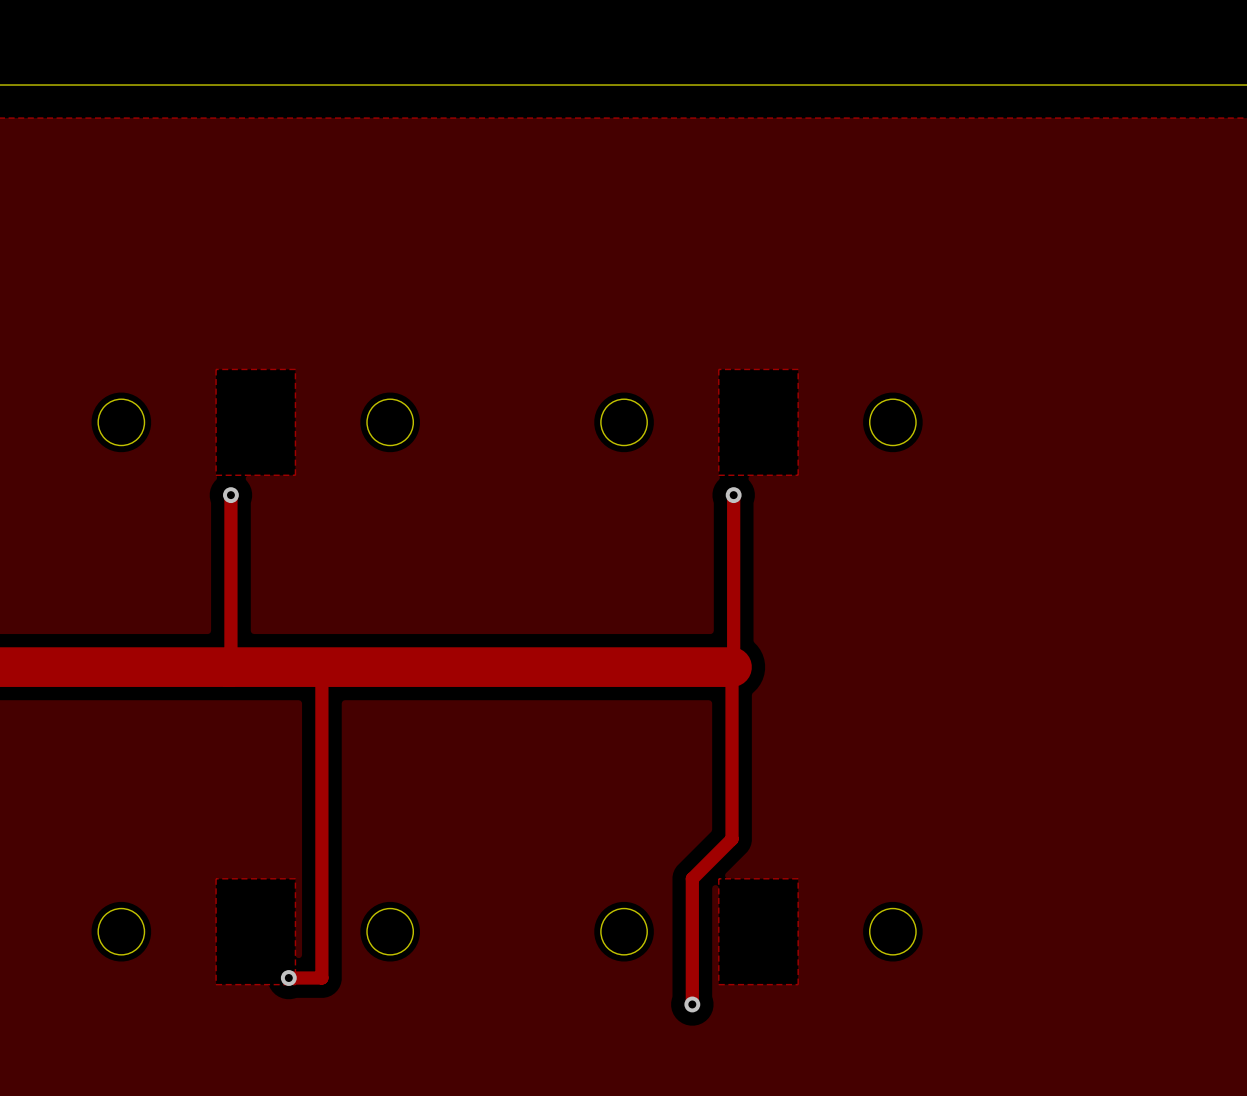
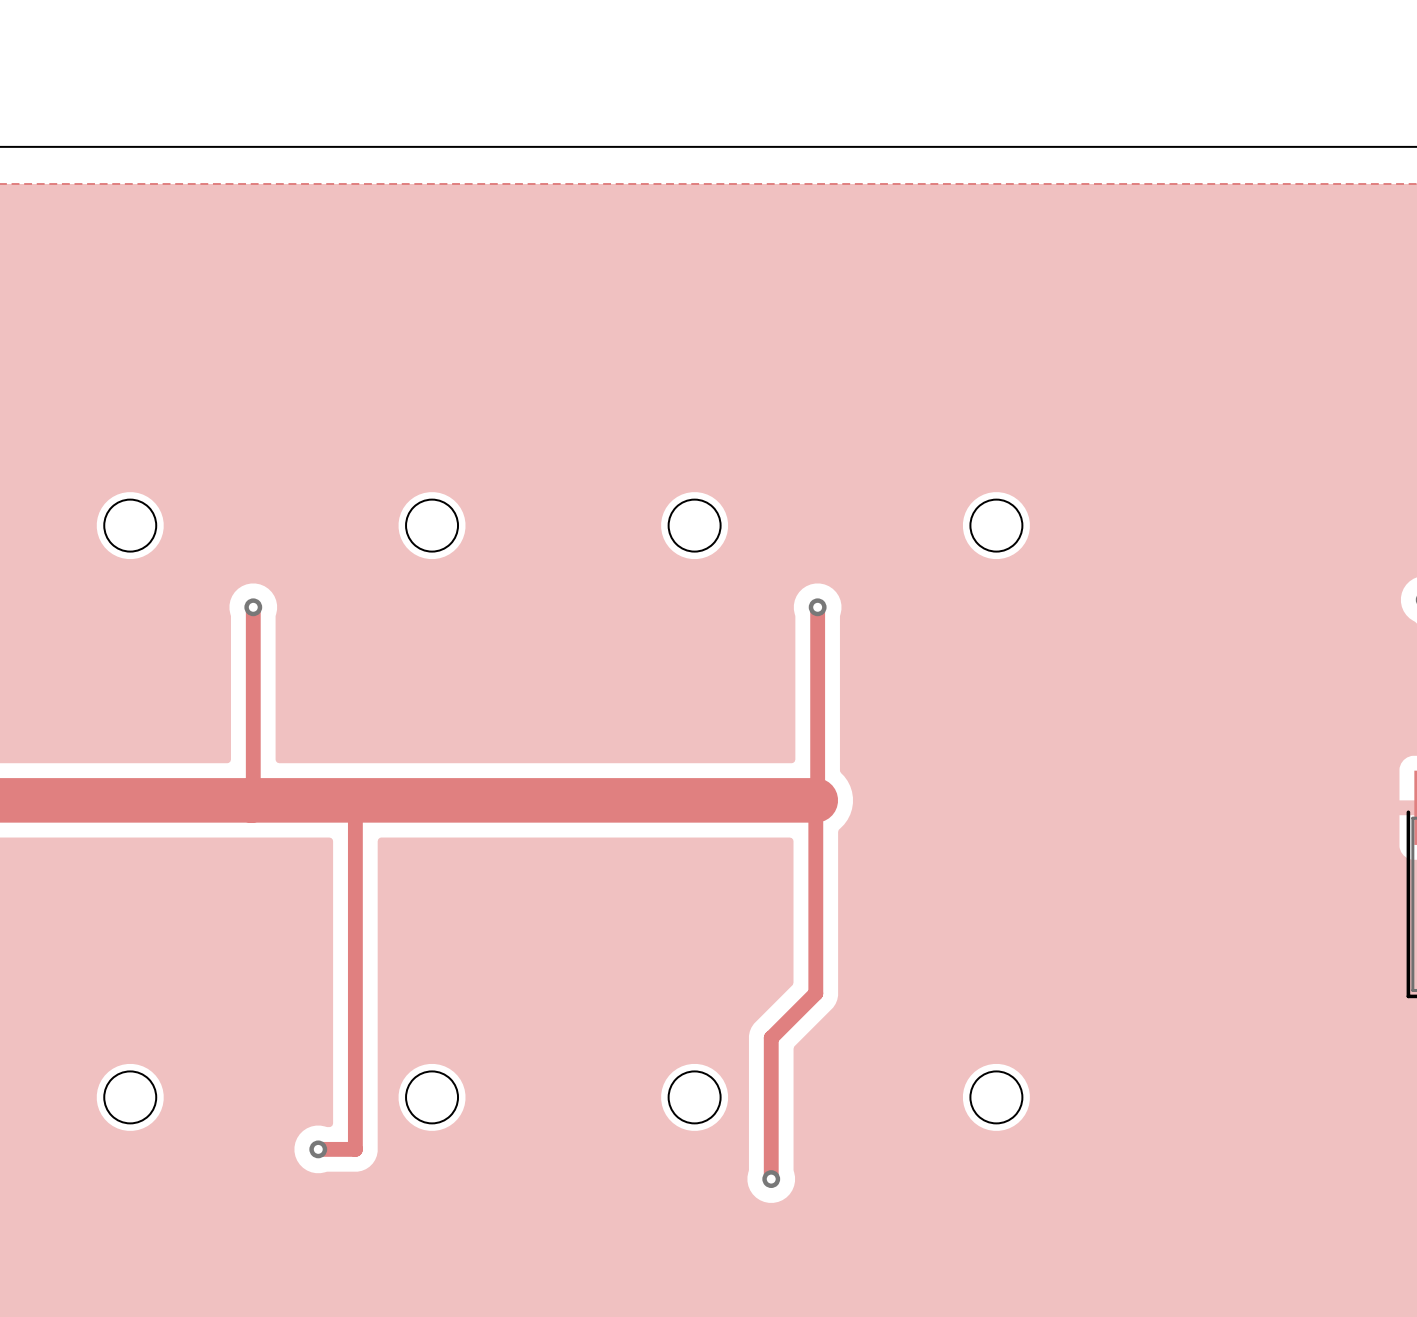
zone outline: (216, 369) (216, 475) (295, 475) (295, 369) (216, 369) -> none
zone outline: (718, 369) (718, 475) (798, 475) (798, 369) (718, 369) -> none
zone outline: (216, 878) (295, 878) (295, 984) (216, 984) (216, 878) -> none
zone outline: (718, 878) (798, 878) (798, 984) (718, 984) (718, 878) -> none

